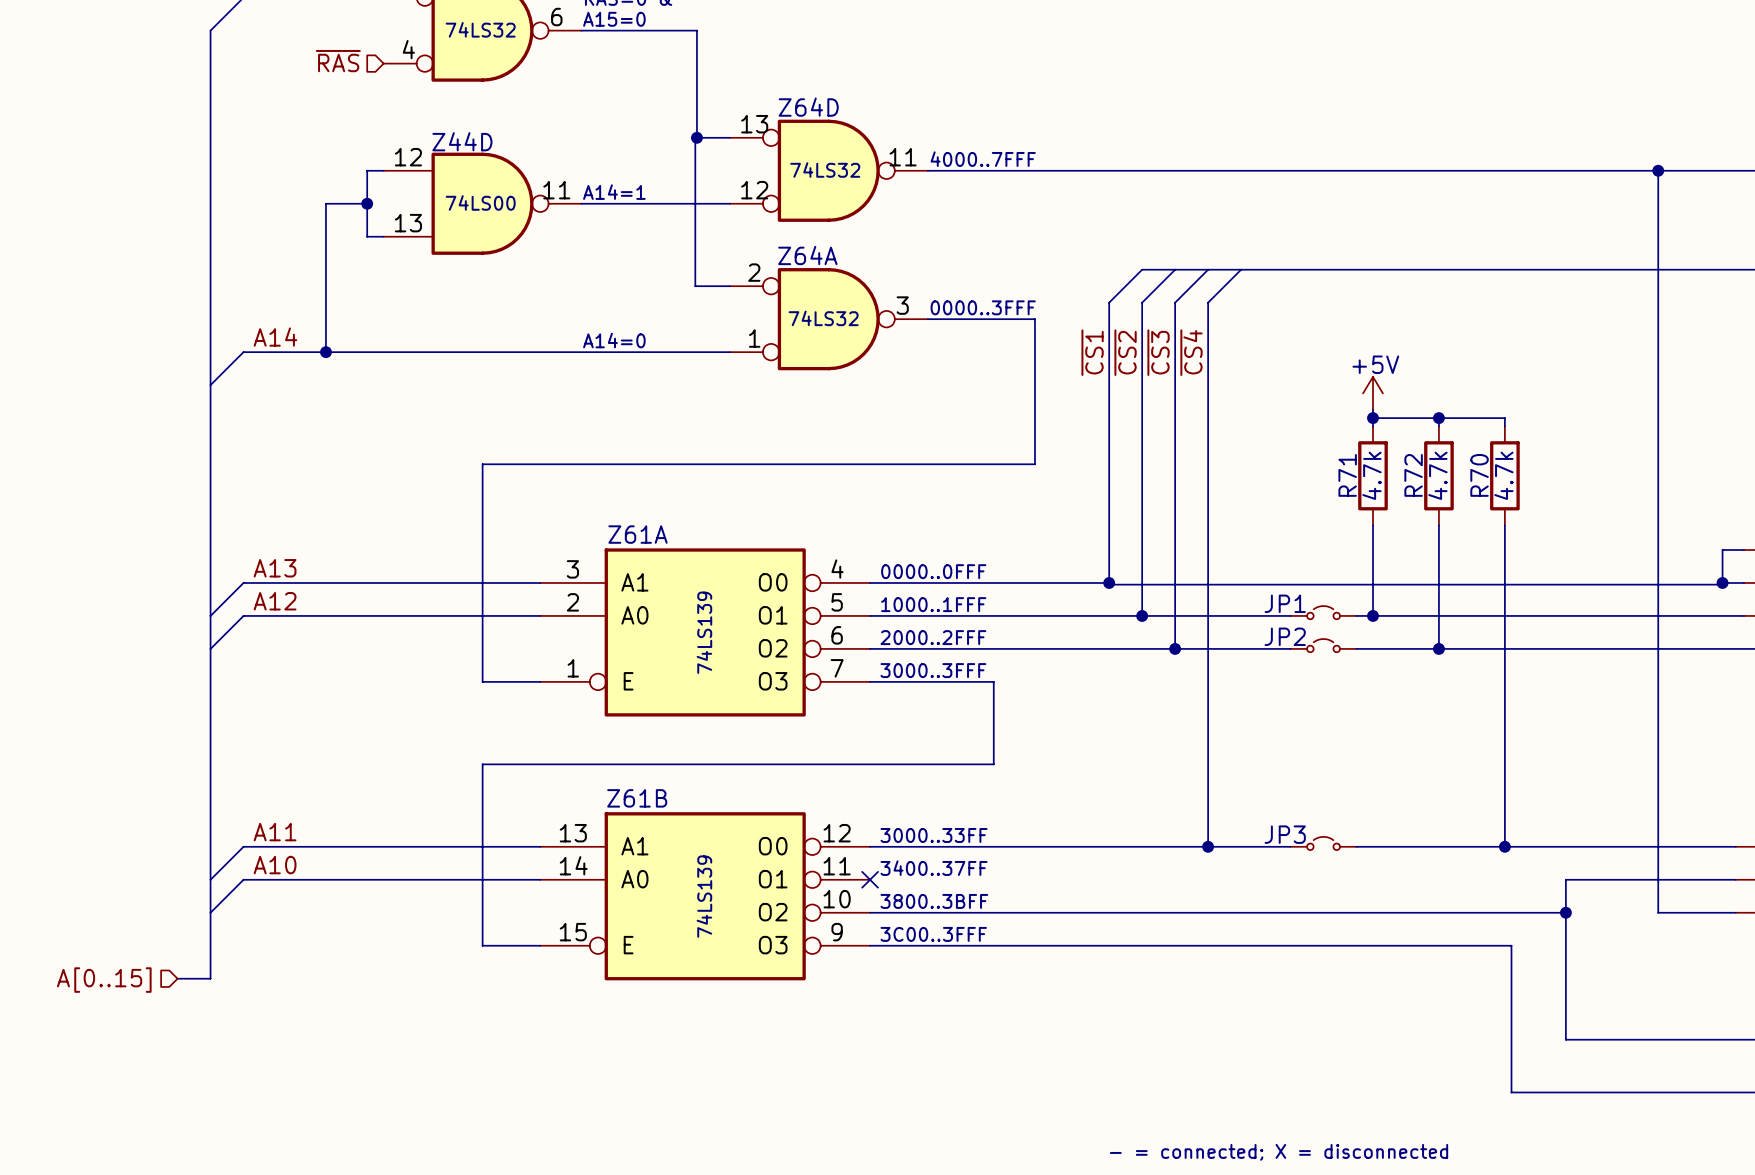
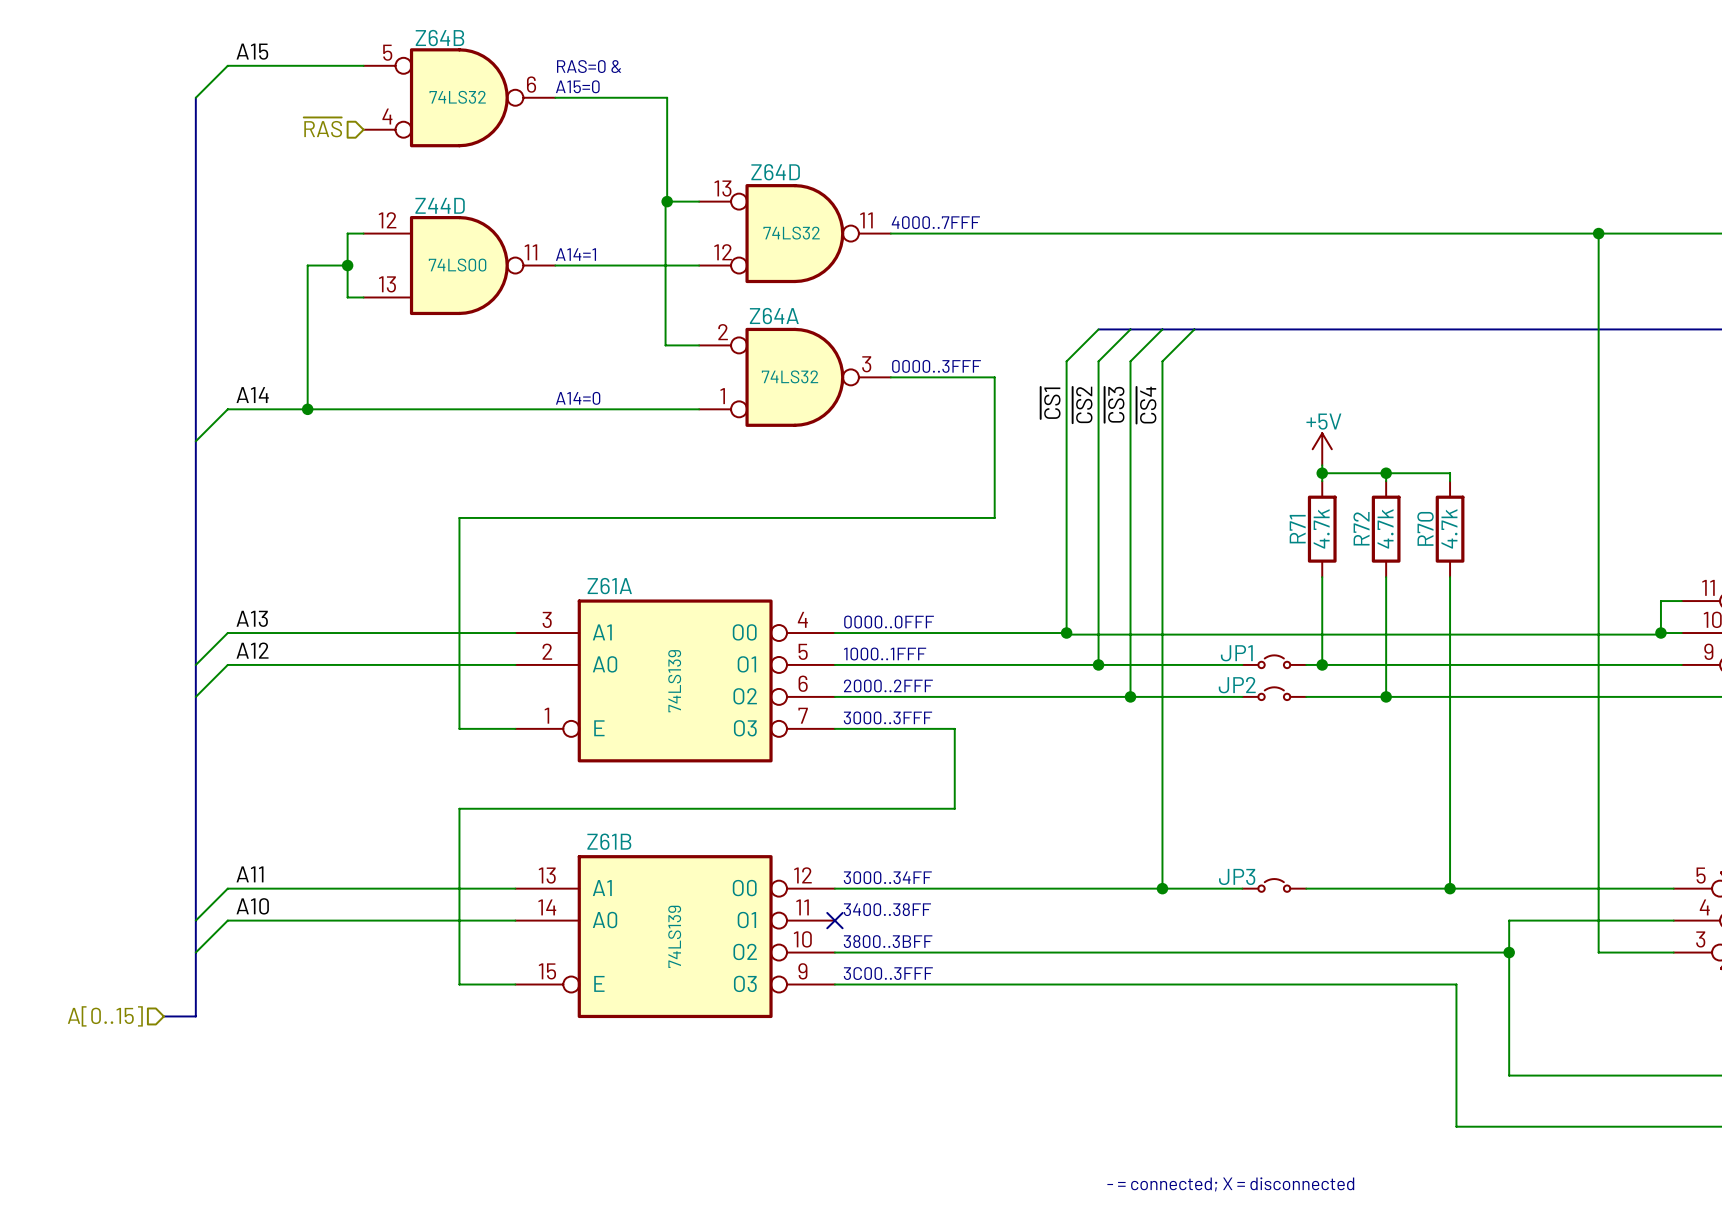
text: 3000..33FF (934, 835) -> 3000..34FF (887, 877)
text: 3400..37FF (934, 868) -> 3400..38FF (887, 909)

